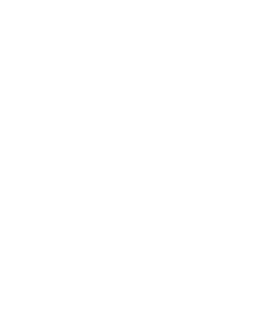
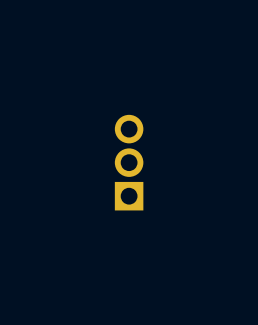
part: none -> (129, 162)

